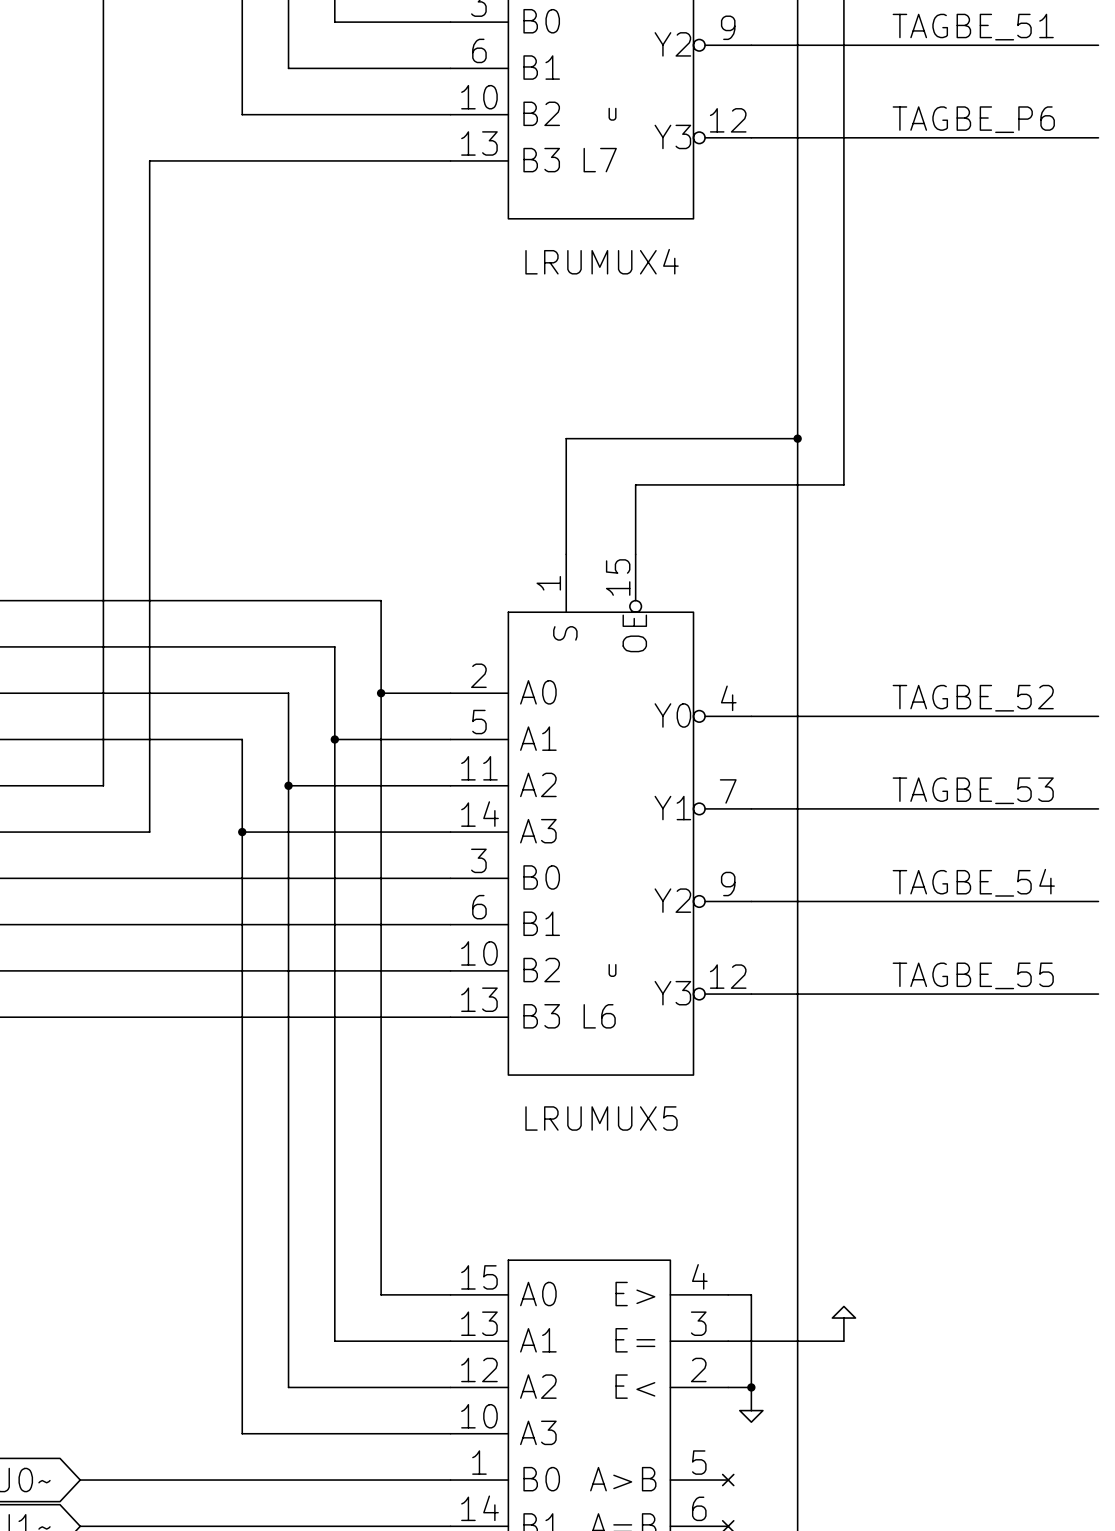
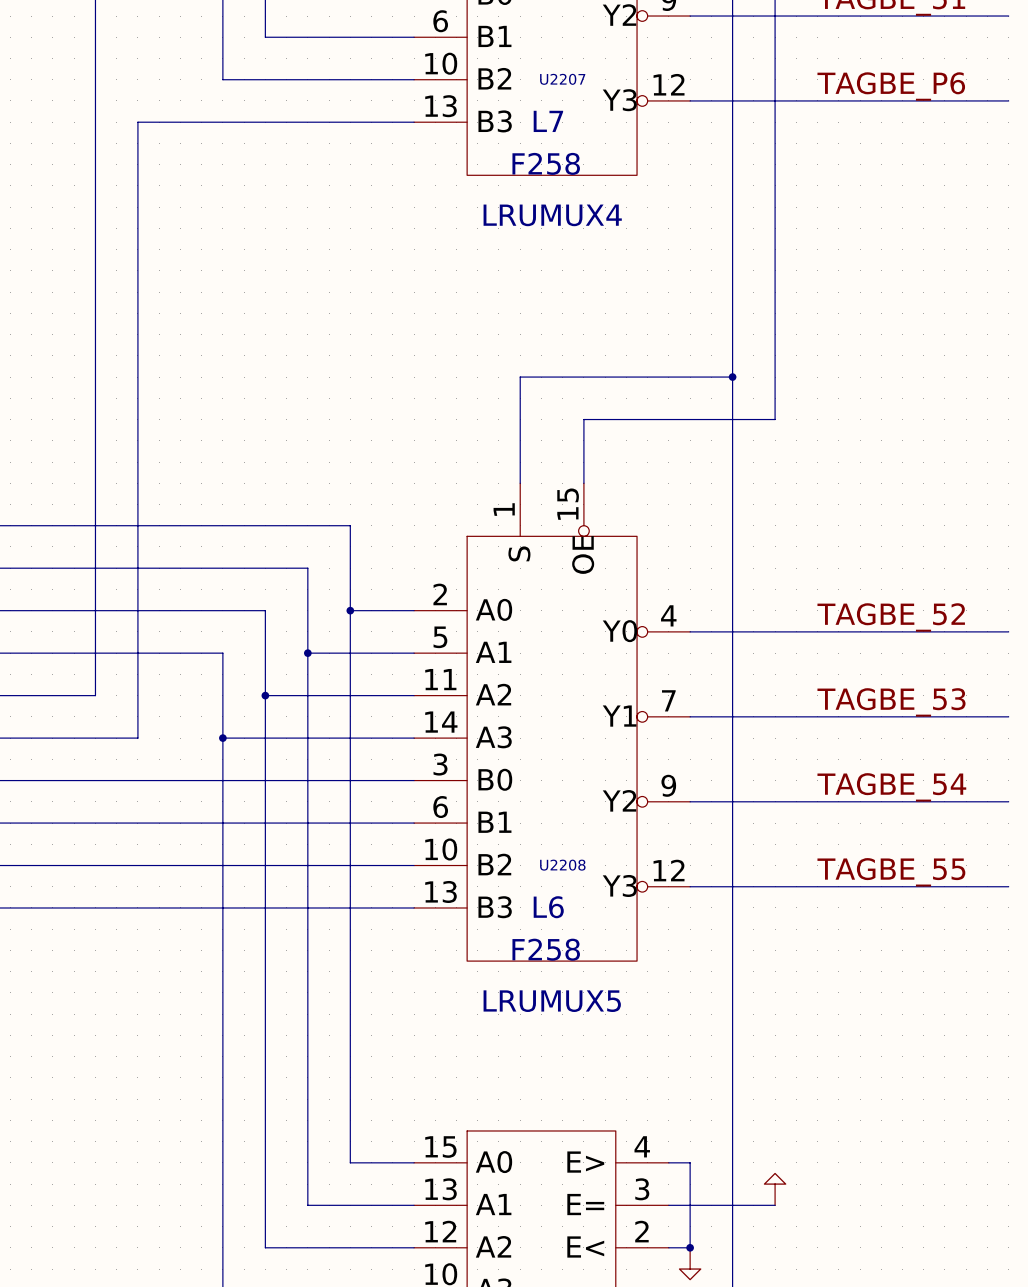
U name: U (612, 114) -> U2207 (562, 79)
U value: none -> F258 (546, 163)
U name: U (612, 970) -> U2208 (562, 865)
U value: none -> F258 (546, 949)

